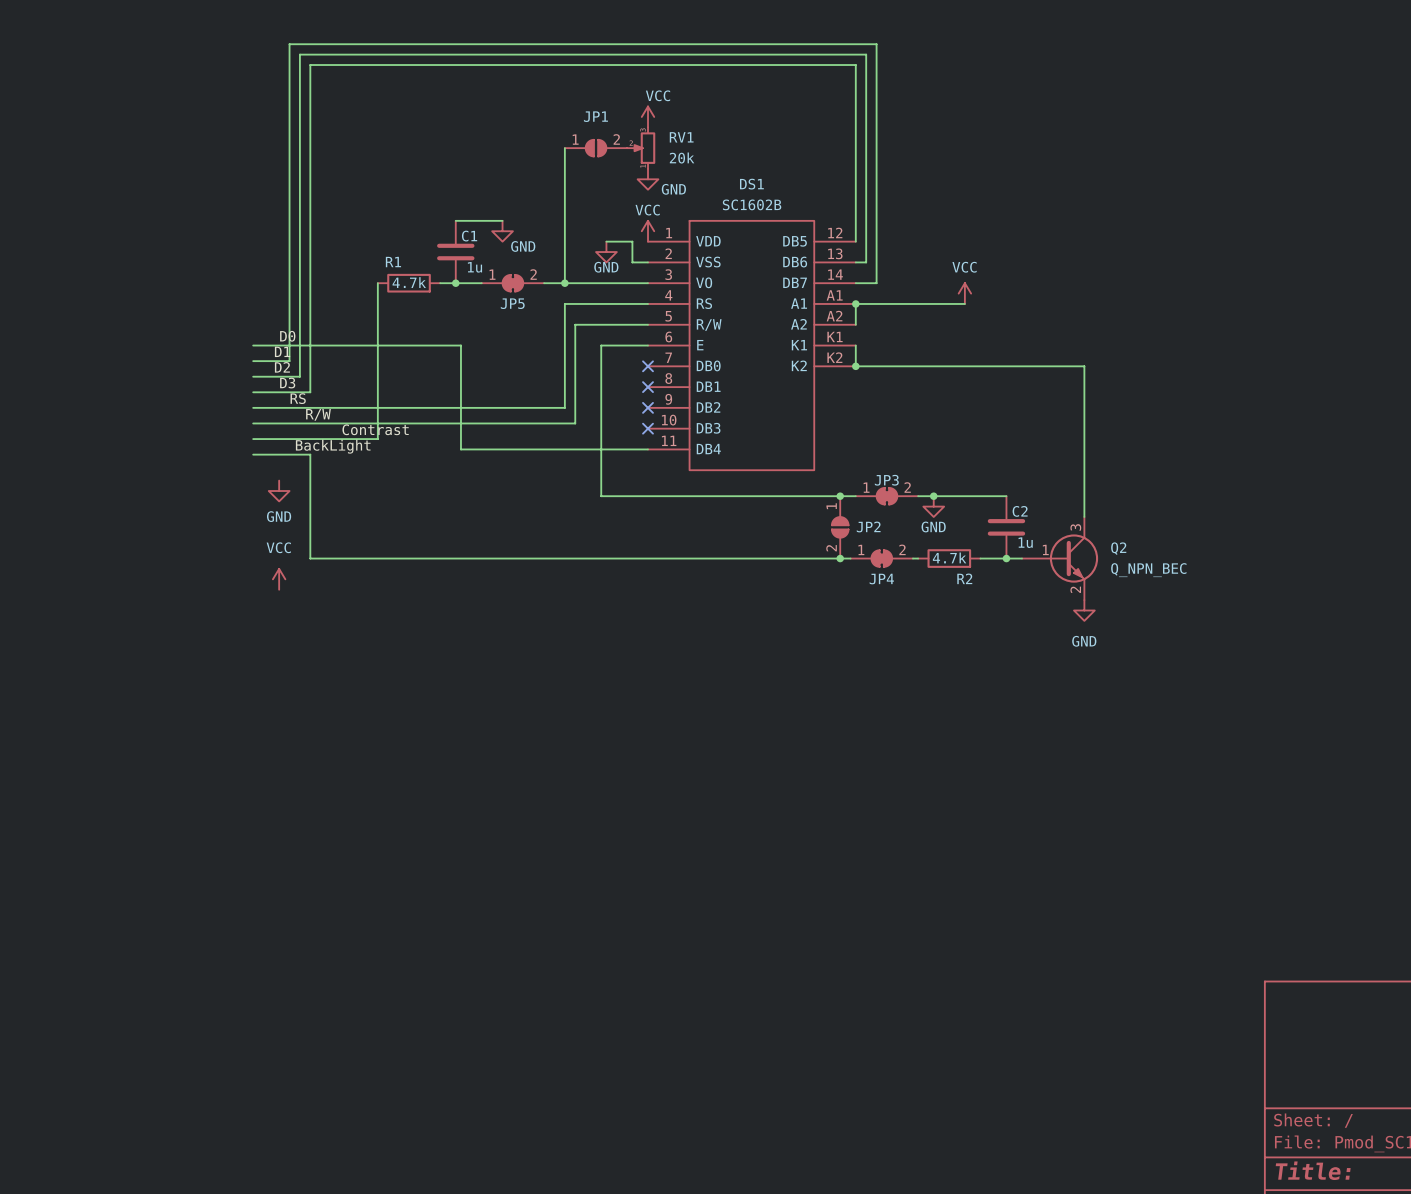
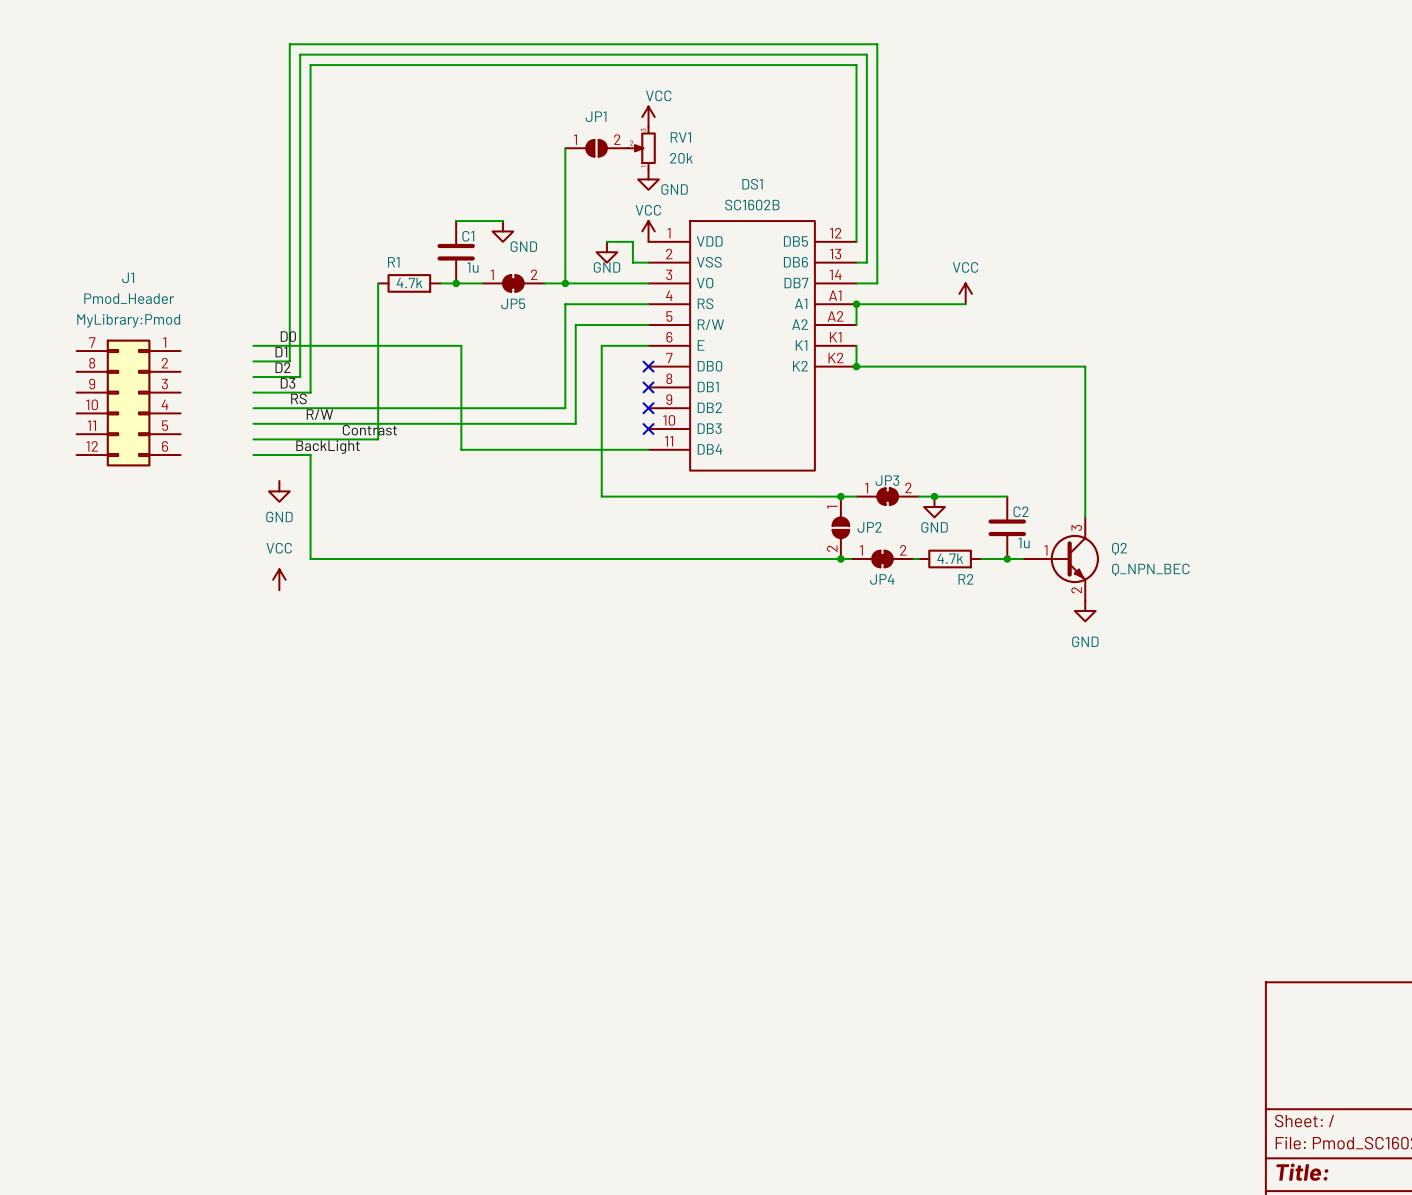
J1: none -> Pmod_Header (128, 403)

